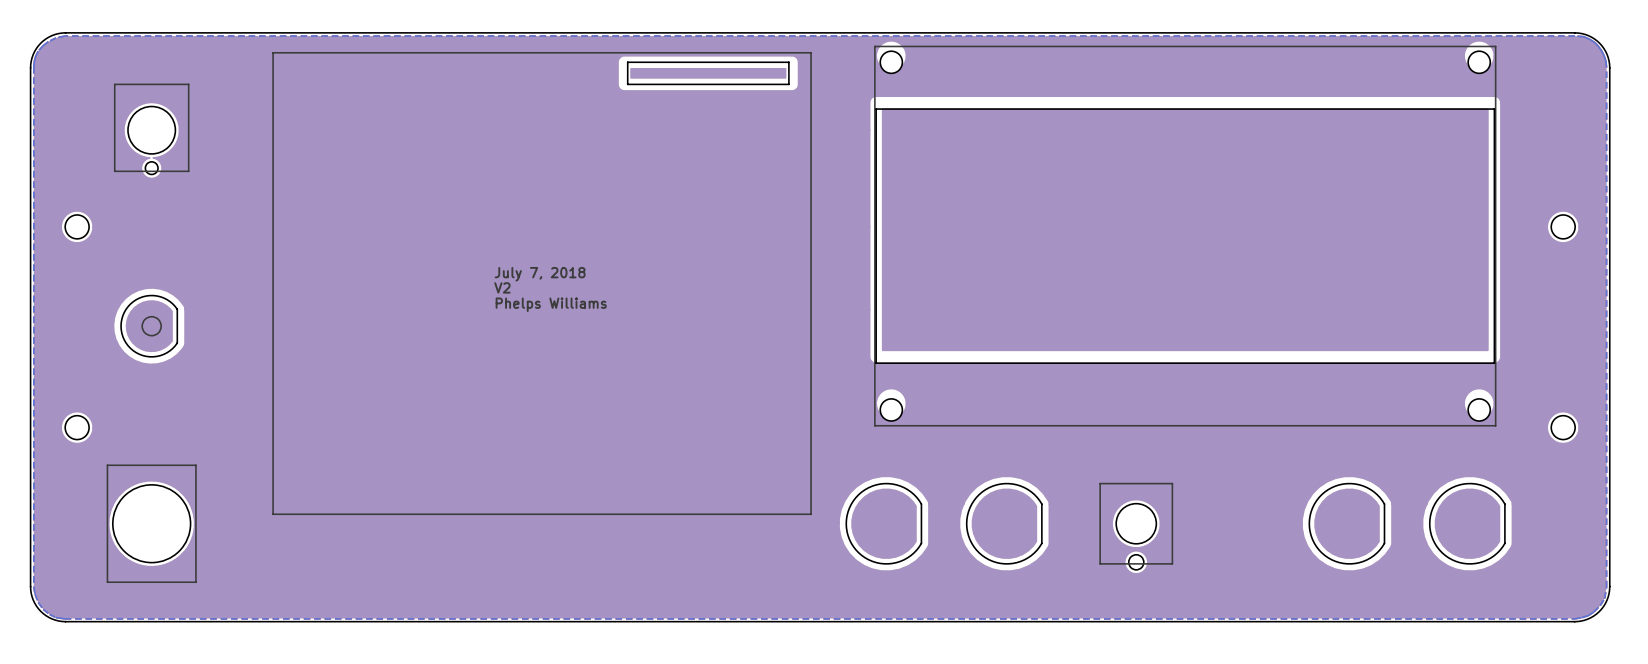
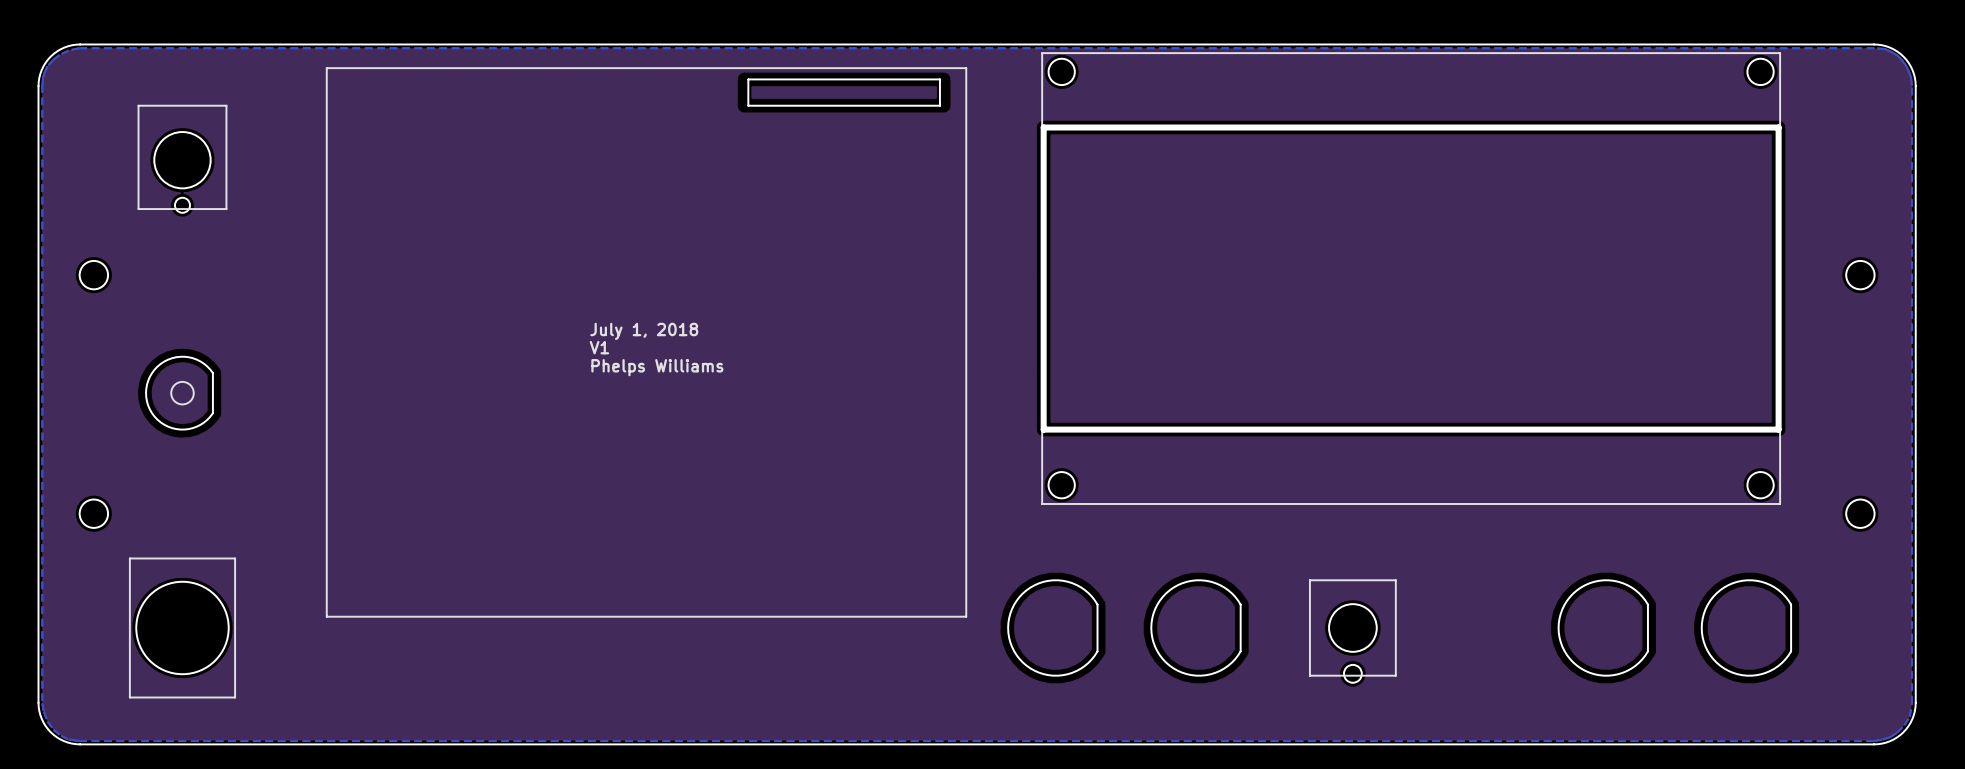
part footprint: [874, 45, 1497, 427] -> [1040, 52, 1782, 505]
text: July 7, 2018 (540, 274) -> July 1, 2018 (644, 331)
text: V2 (502, 287) -> V1 (599, 347)

